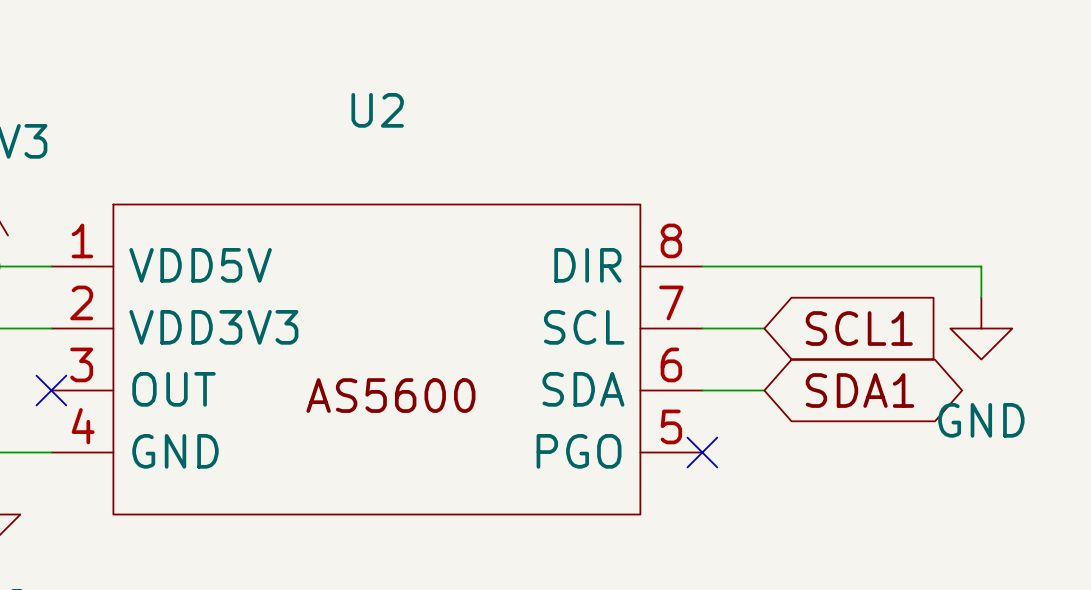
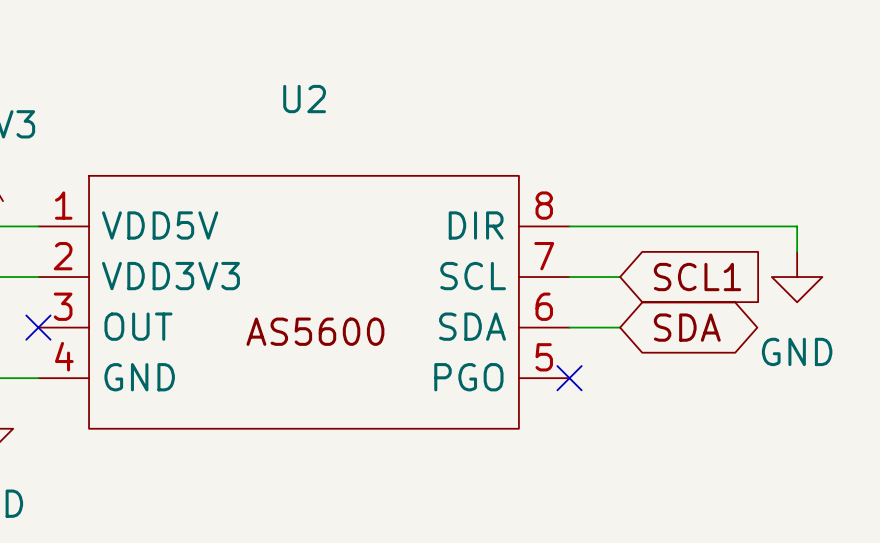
global label: SDA1 (860, 390) -> SDA (687, 327)

